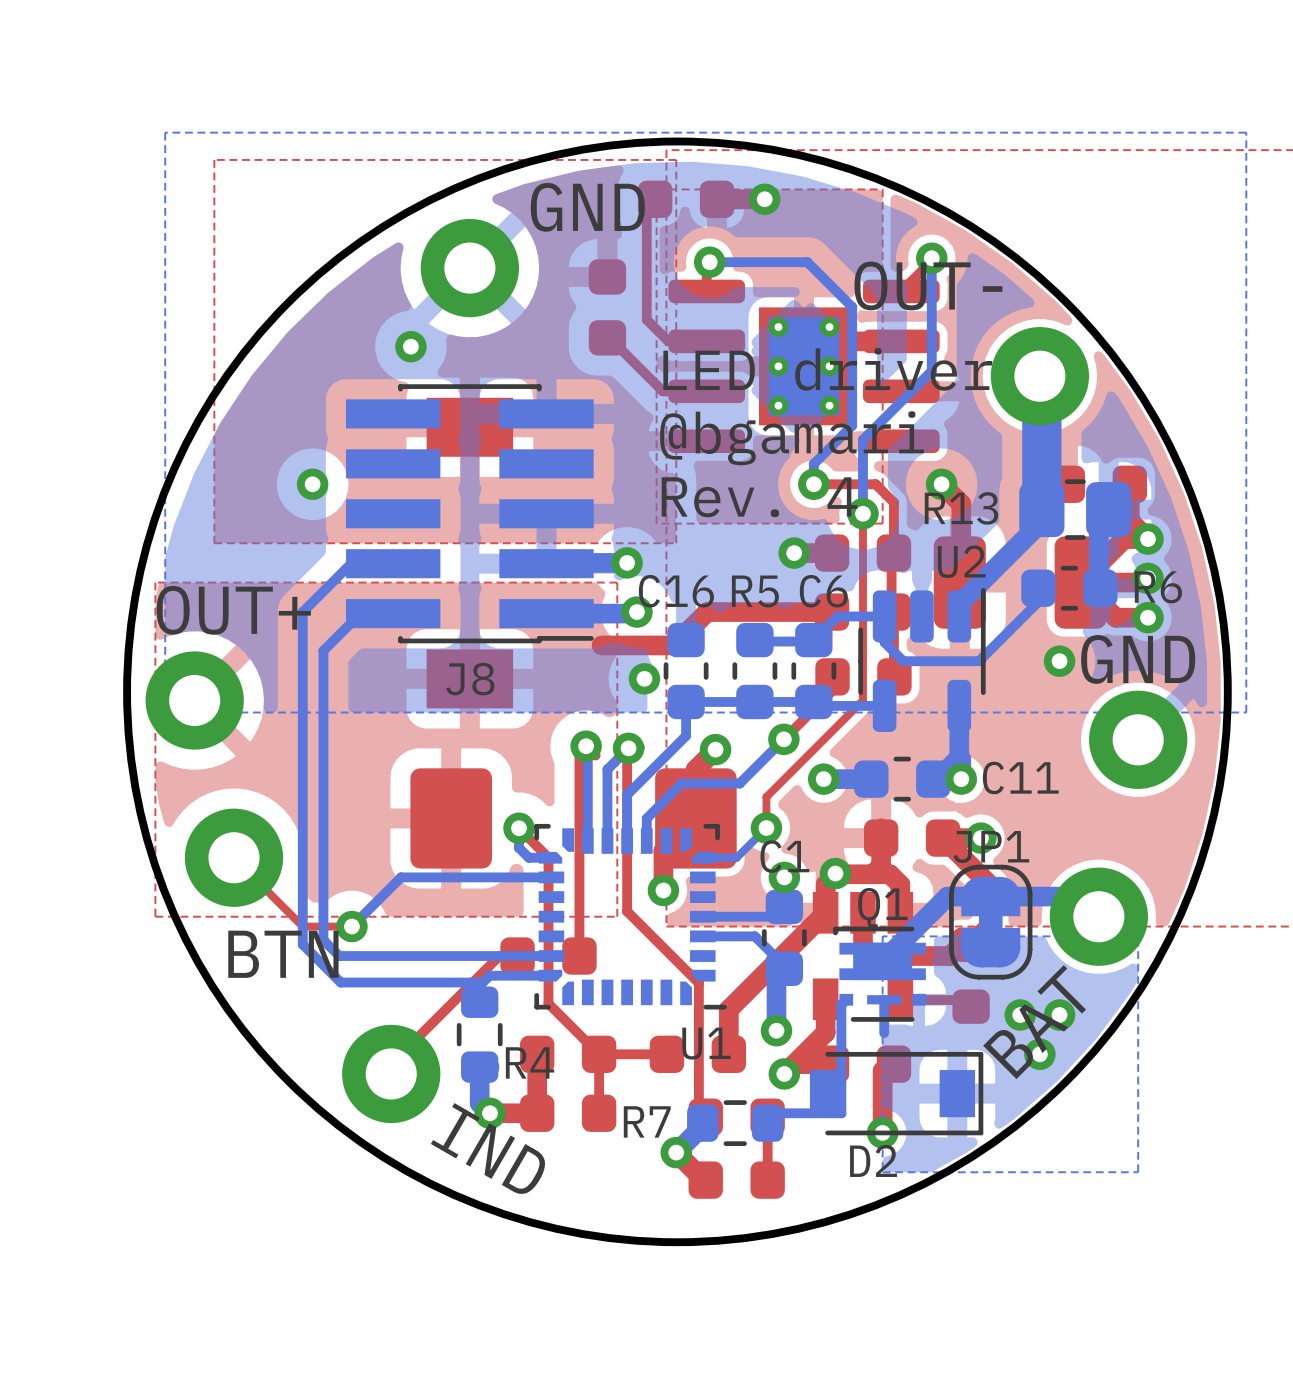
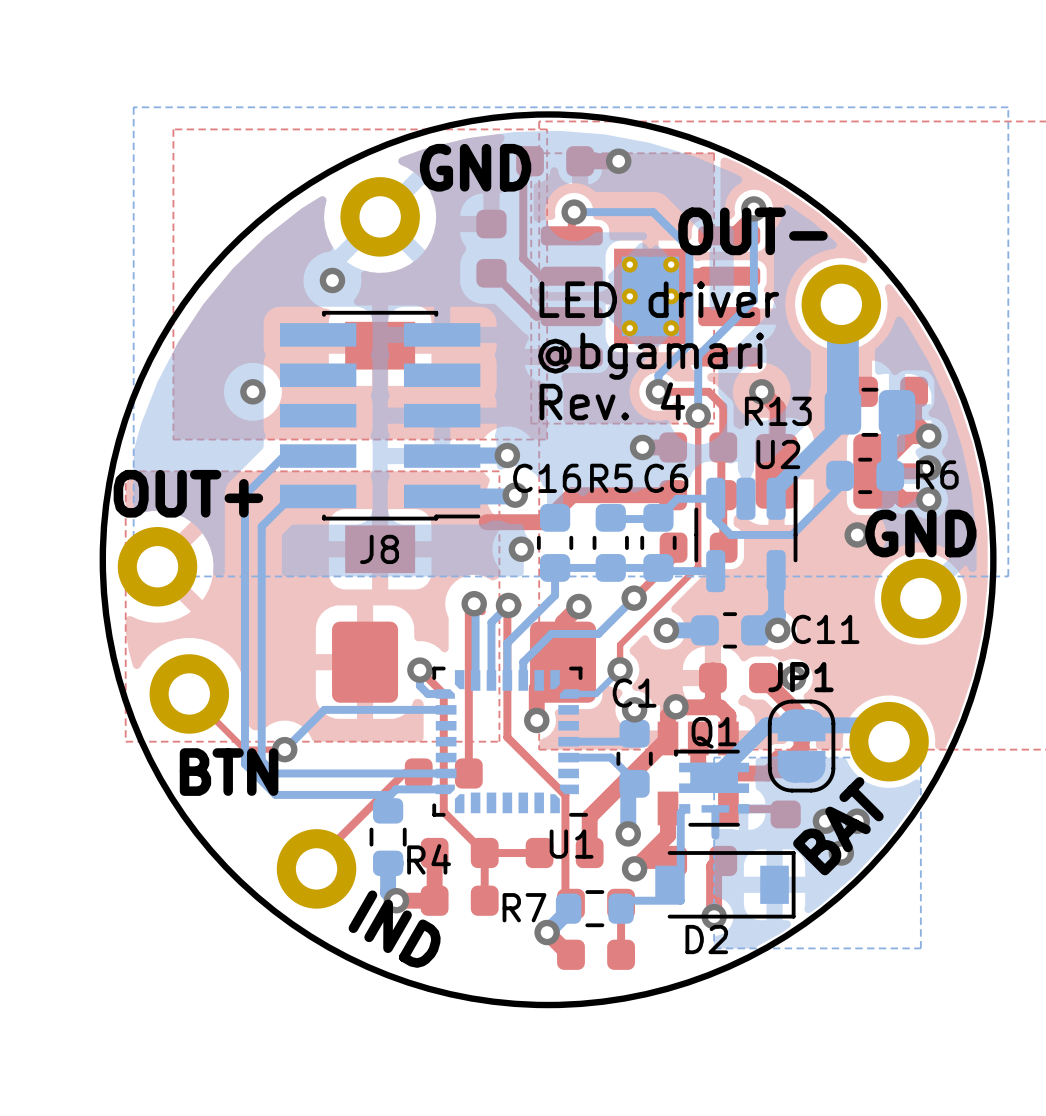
JP1 footprint: [949, 864, 1033, 980] -> [767, 699, 836, 793]

